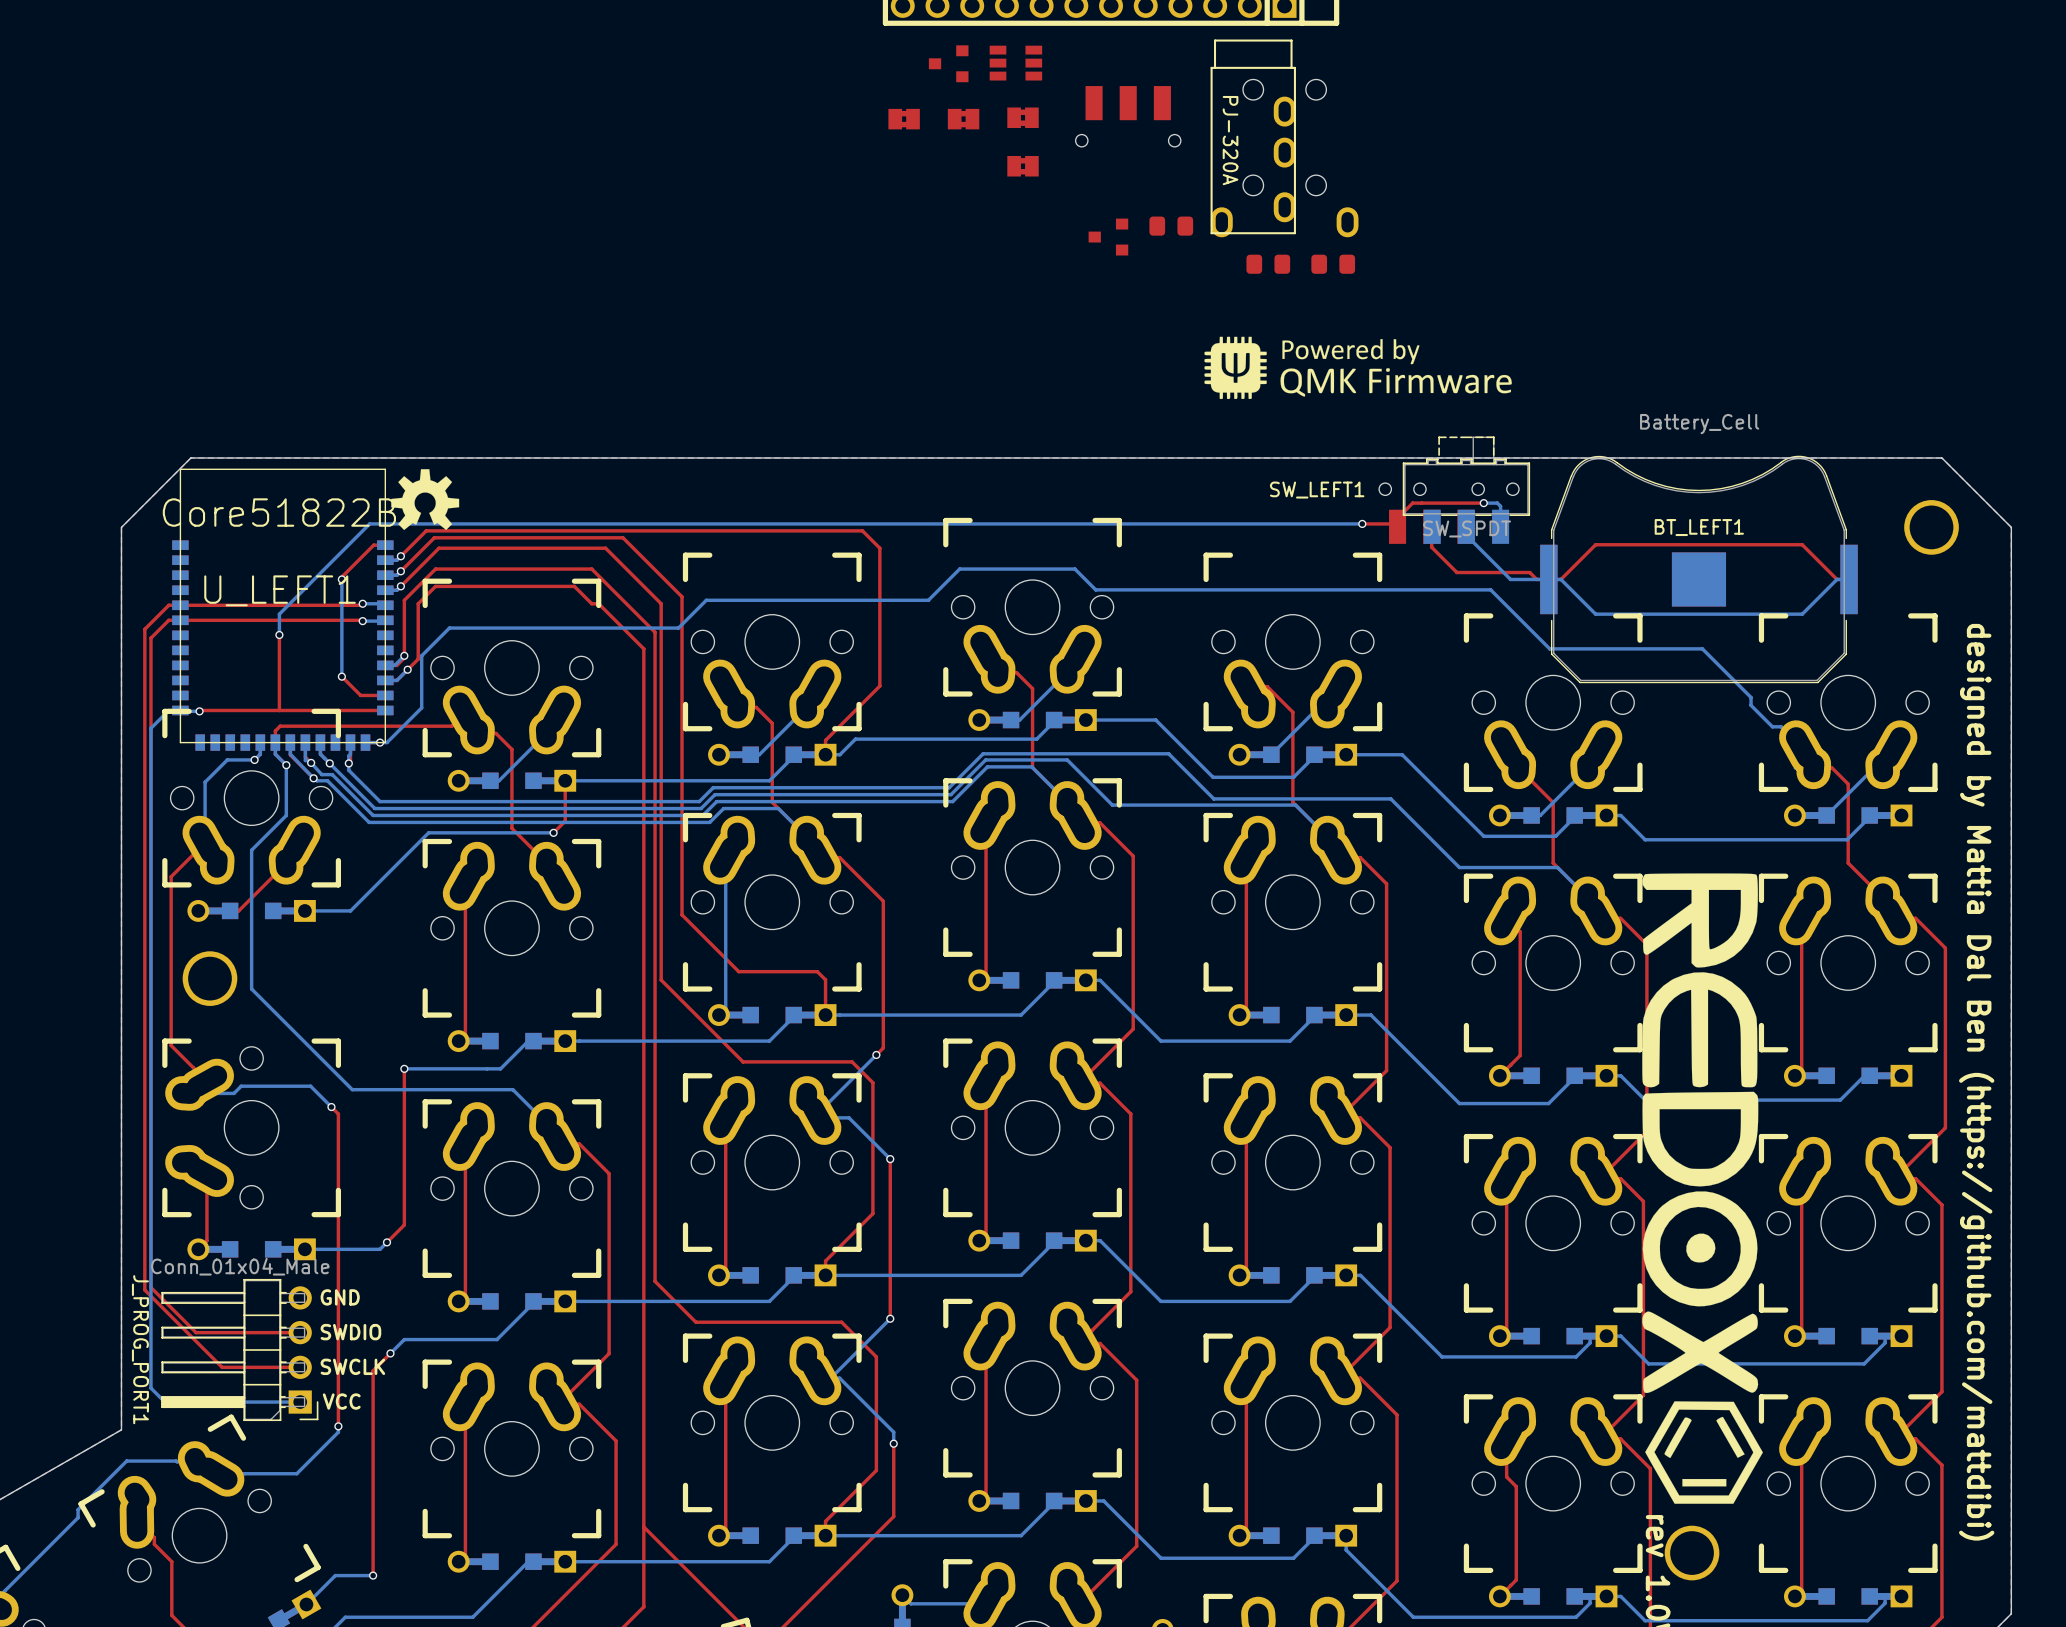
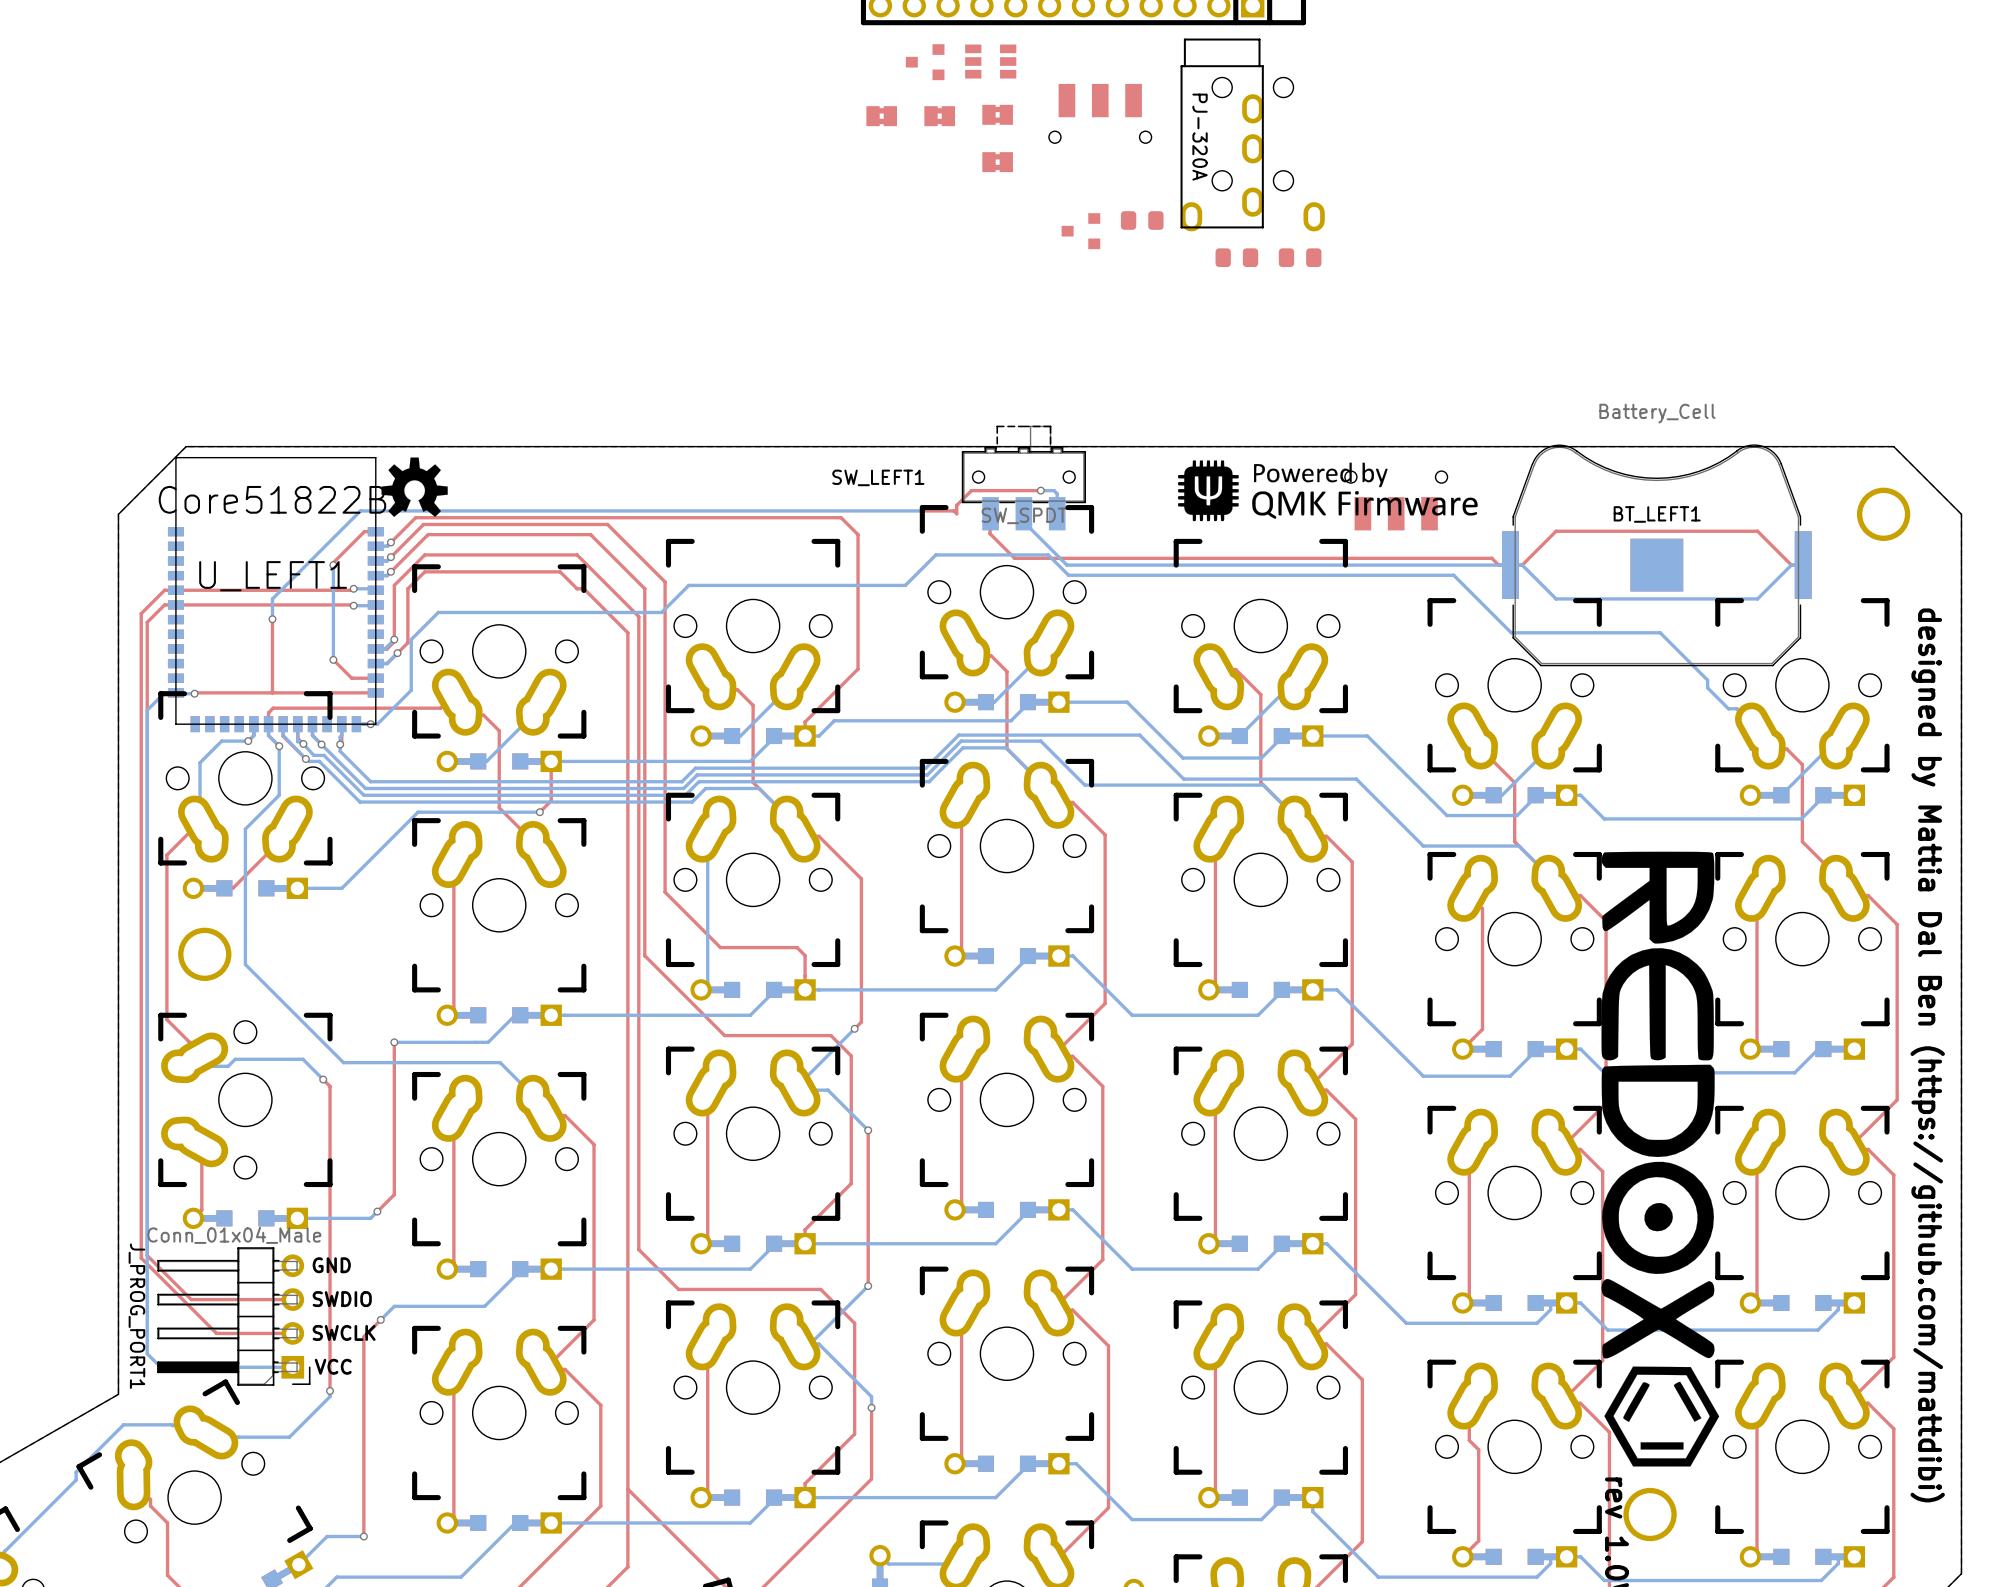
drawing position: (1358, 367) -> (1327, 490)
SW_LEFT1 position: (1466, 490) -> (1023, 478)
bottom track: none -> (1040, 490) (1054, 490) (1057, 493) (1057, 513)
top track: none -> (1040, 490) (971, 490) (956, 505) (956, 513) (953, 510) (922, 510)
via: none -> (1040, 490)
bottom track: (1483, 503) (1497, 503) (1500, 506) (1500, 526) -> none
top track: (1483, 503) (1412, 503) (1397, 518) (1397, 526) (1394, 523) (1362, 523) -> none
via: (1483, 503) -> none
bottom track: (1362, 523) (945, 523) -> none
via: (1362, 523) -> none
top track: (1431, 526) (1431, 547) (1456, 572) -> (990, 513) (990, 533) (1014, 558) (1420, 558)
bottom track: (1466, 526) (1466, 535) (1510, 579) -> (1023, 513) (1023, 522) (1066, 565) (1473, 565)

